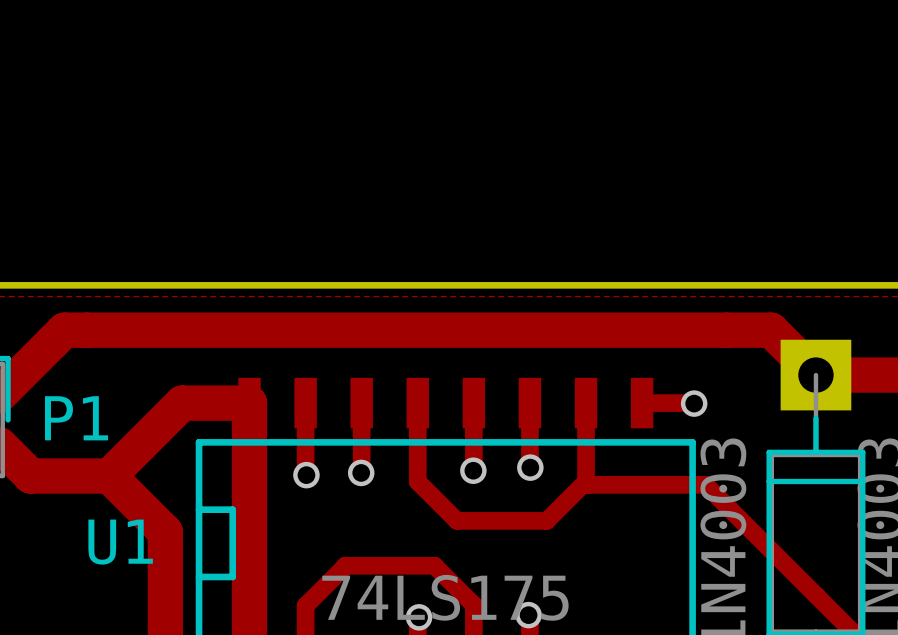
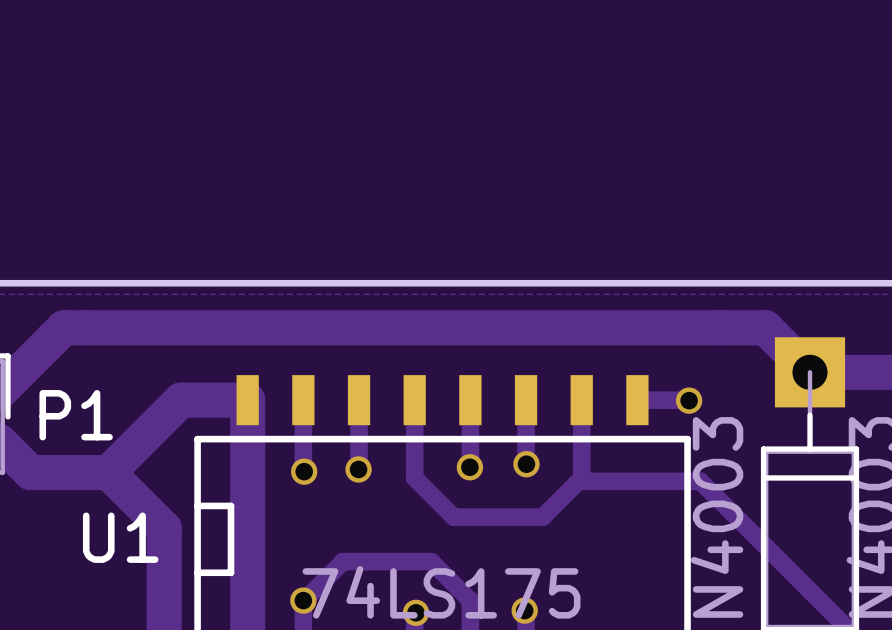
via: none -> (303, 600)

